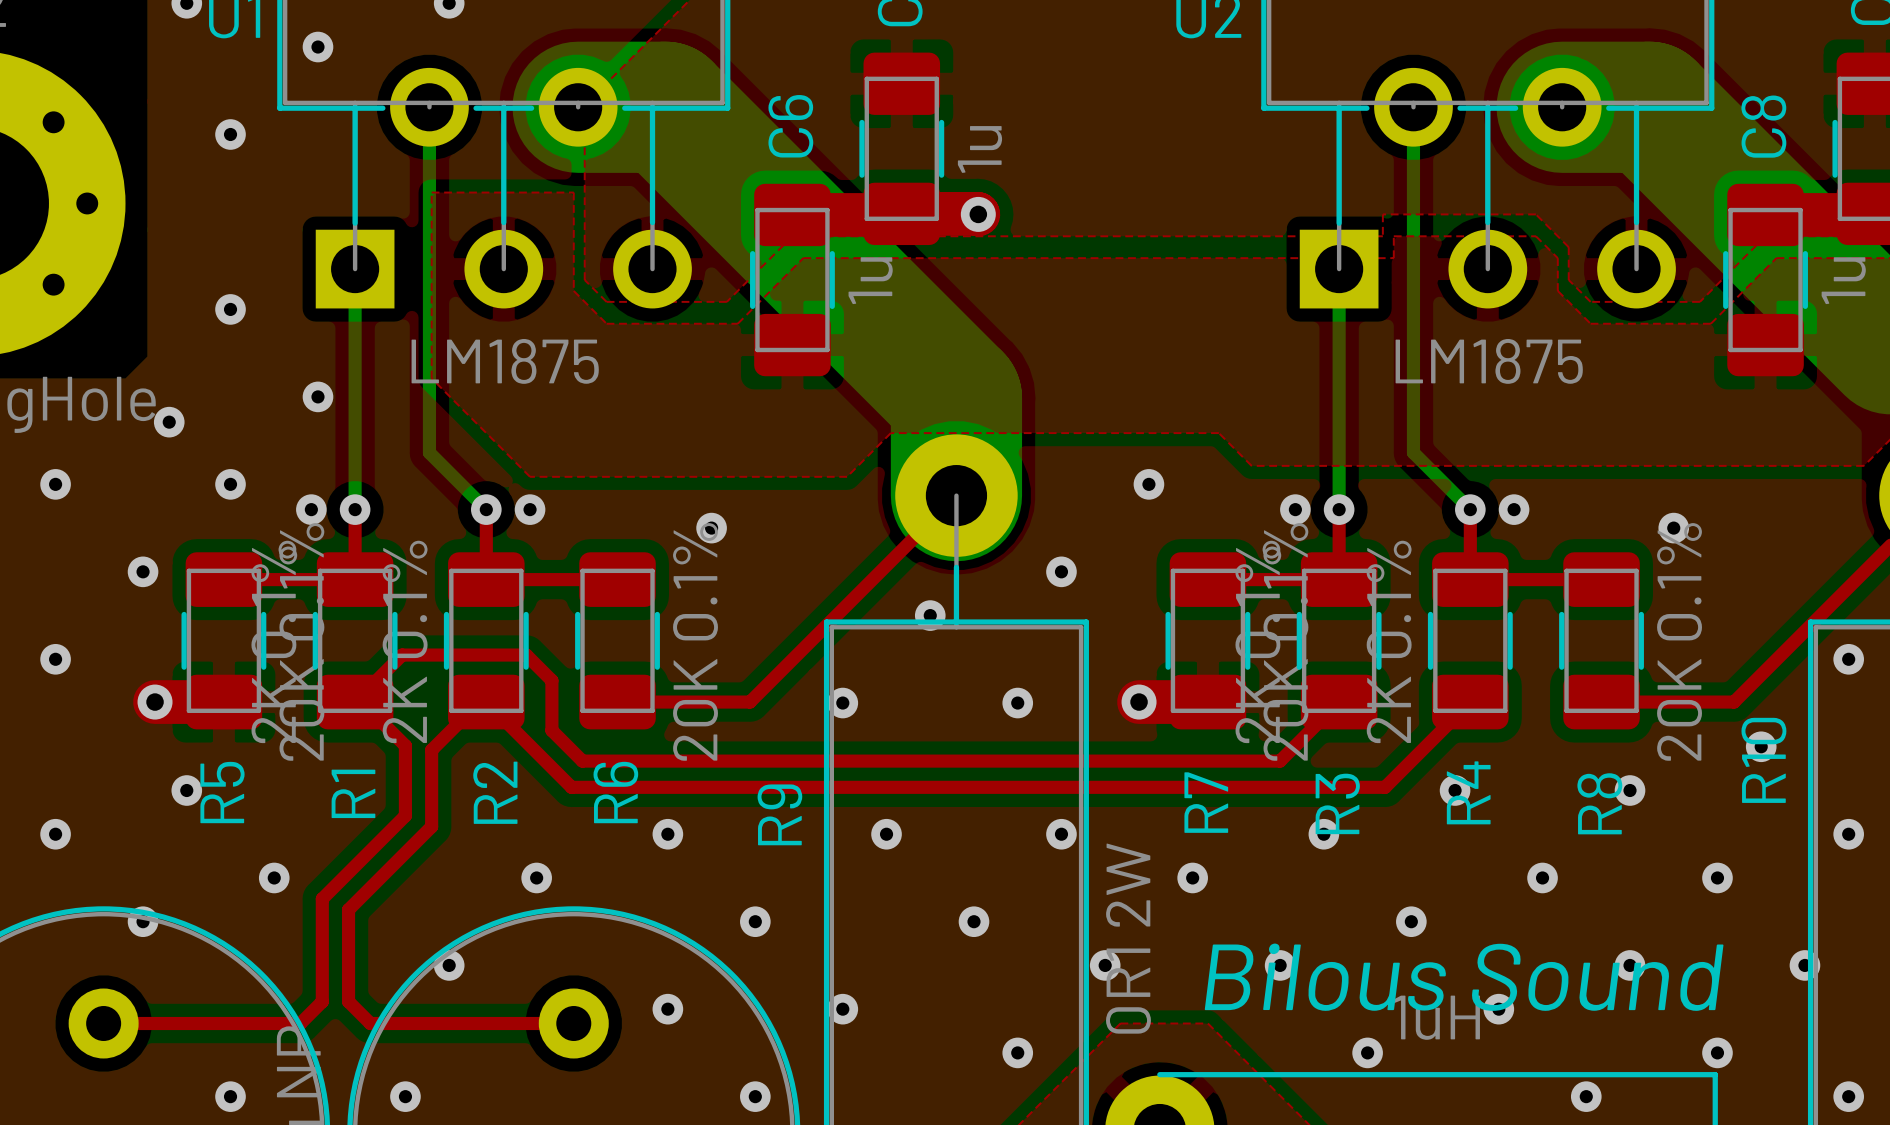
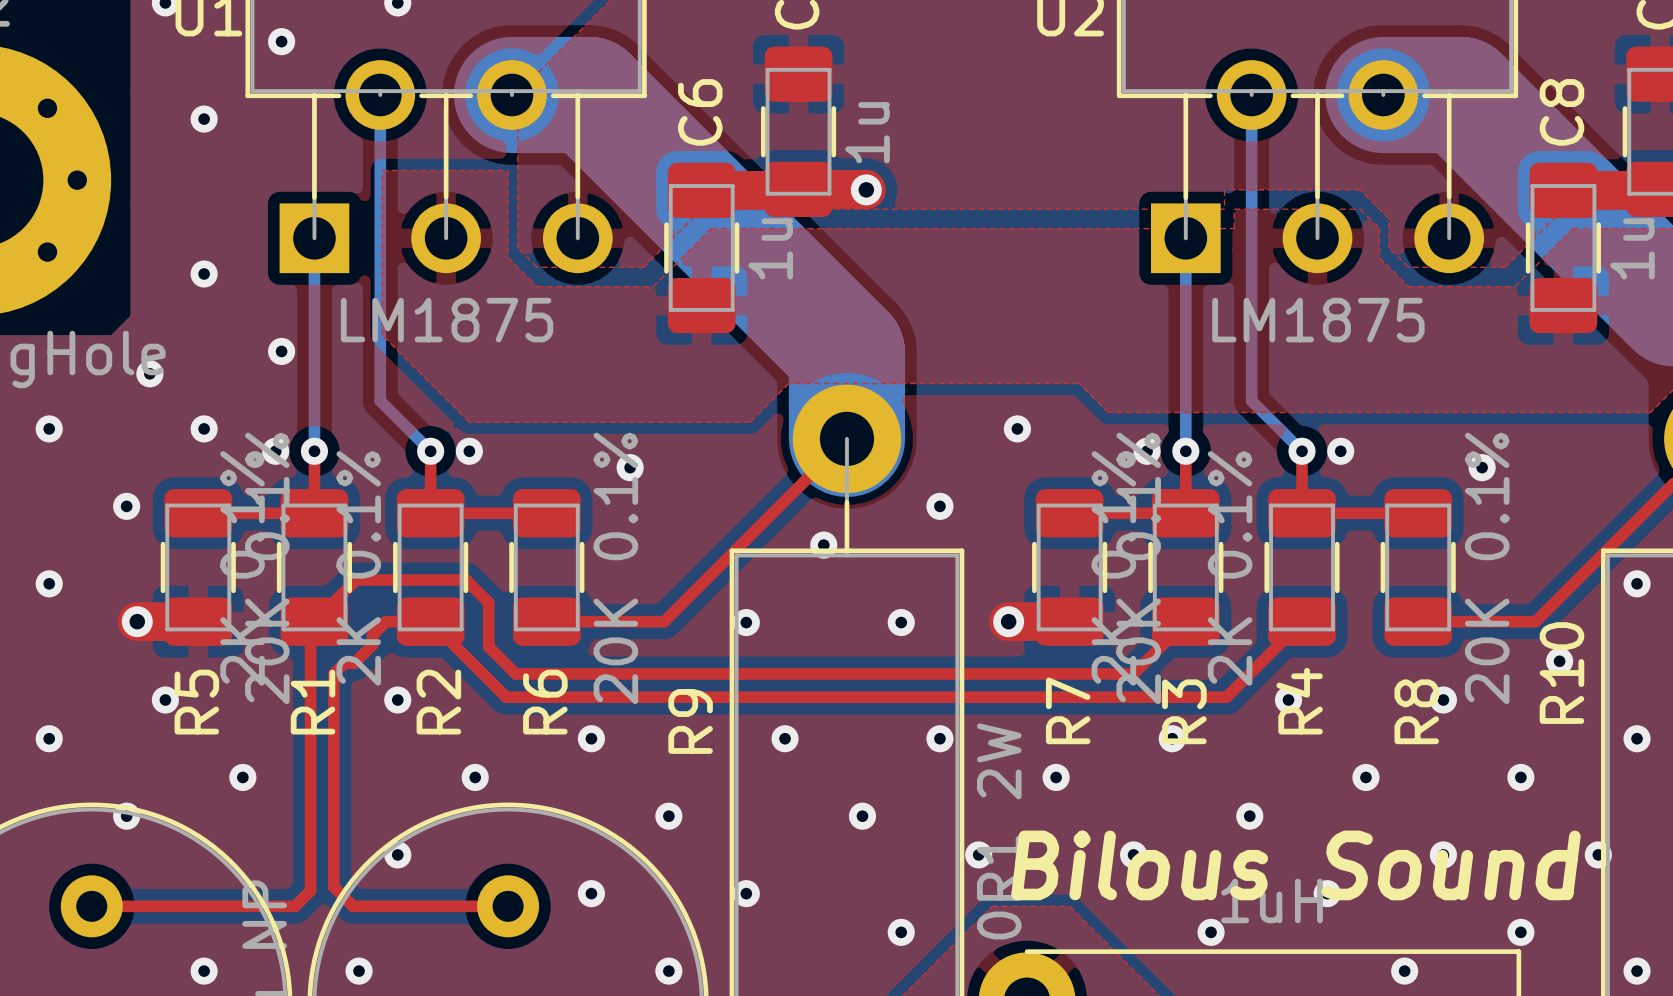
top track: (355, 702) (361, 702) (405, 745) (405, 815) (322, 898) (322, 1001) (300, 1023) -> (314, 621) (310, 625) (310, 890) (295, 906) (266, 906)
top track: (479, 702) (431, 750) (431, 826) (348, 909) (348, 1001) (370, 1023) (398, 1023) -> (424, 621) (386, 621) (372, 635) (372, 644) (354, 663) (344, 663) (333, 673) (333, 886) (353, 906)
via: none -> (397, 700)

